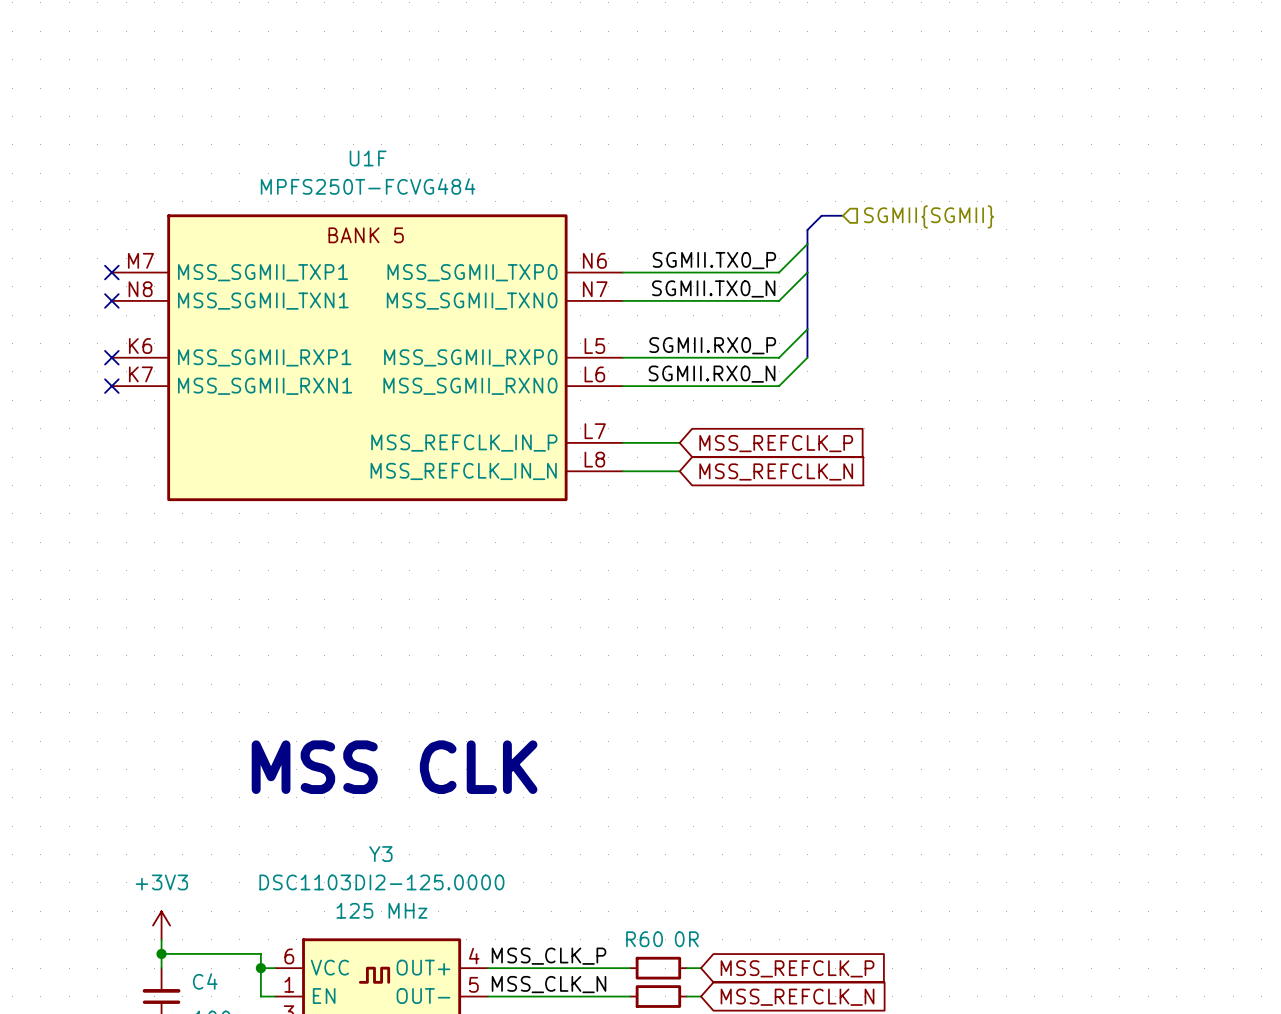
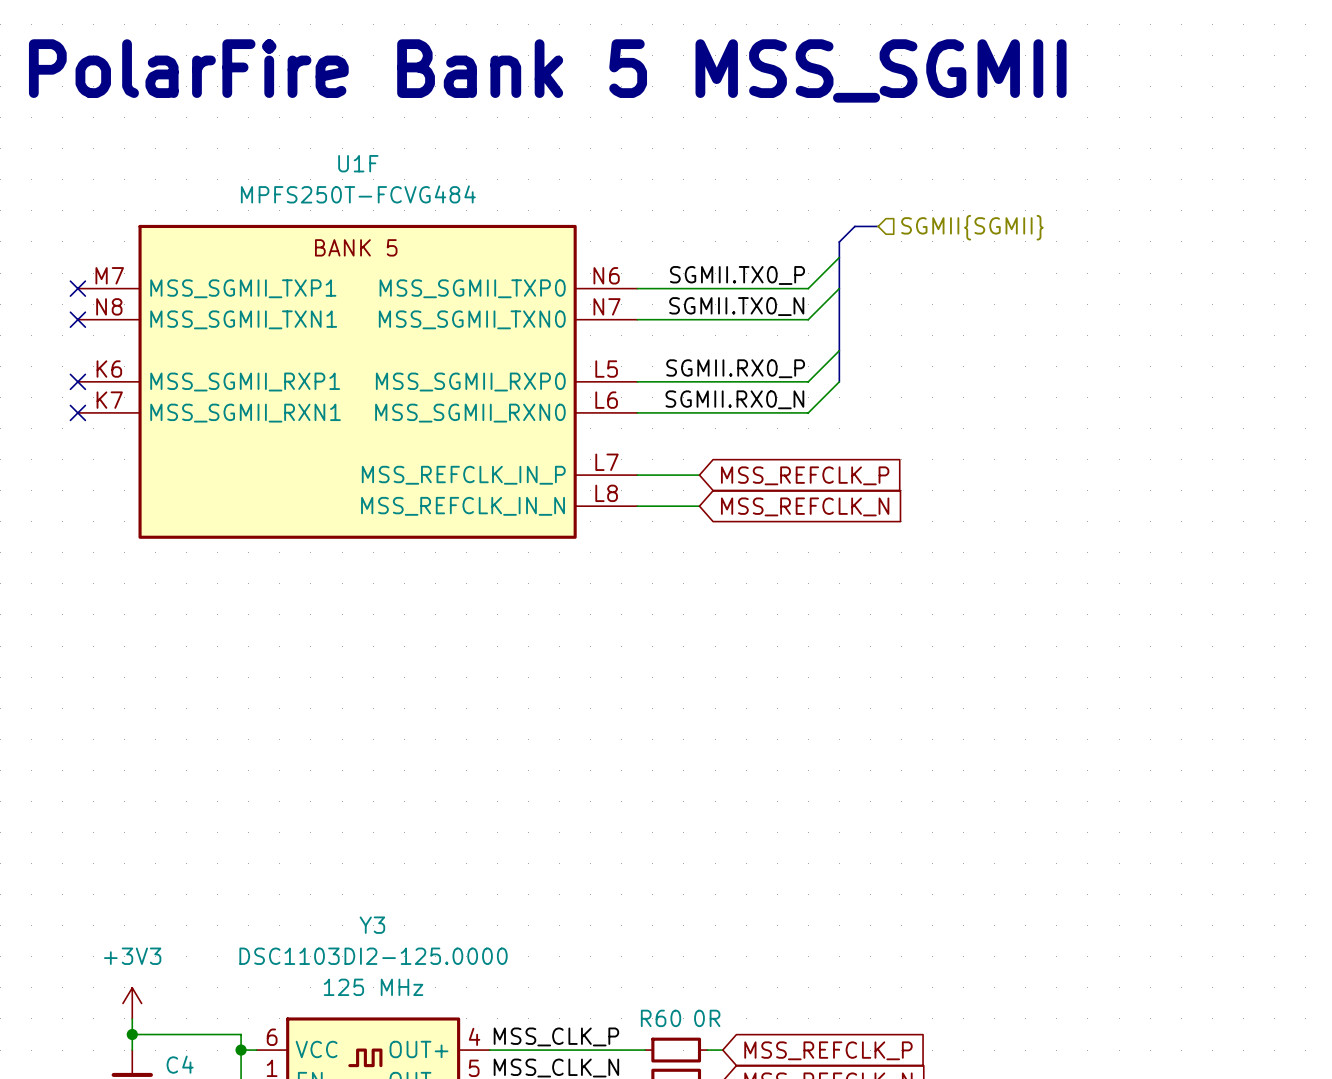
text: none -> PolarFire Bank 5 MSS_SGMII (547, 70)
text: MSS CLK (394, 767) -> none

